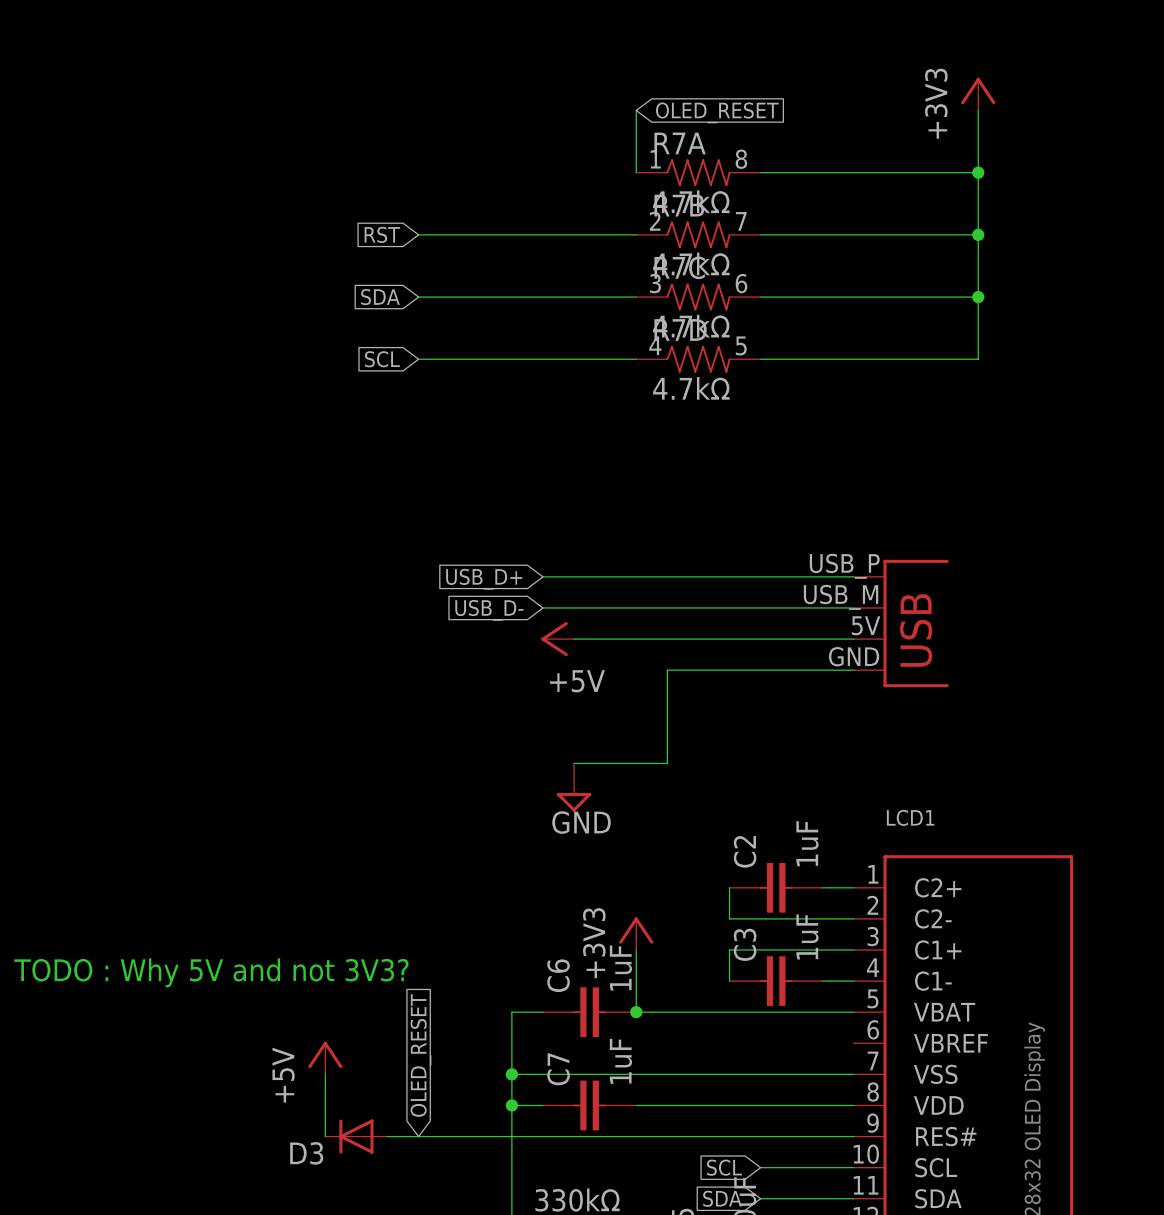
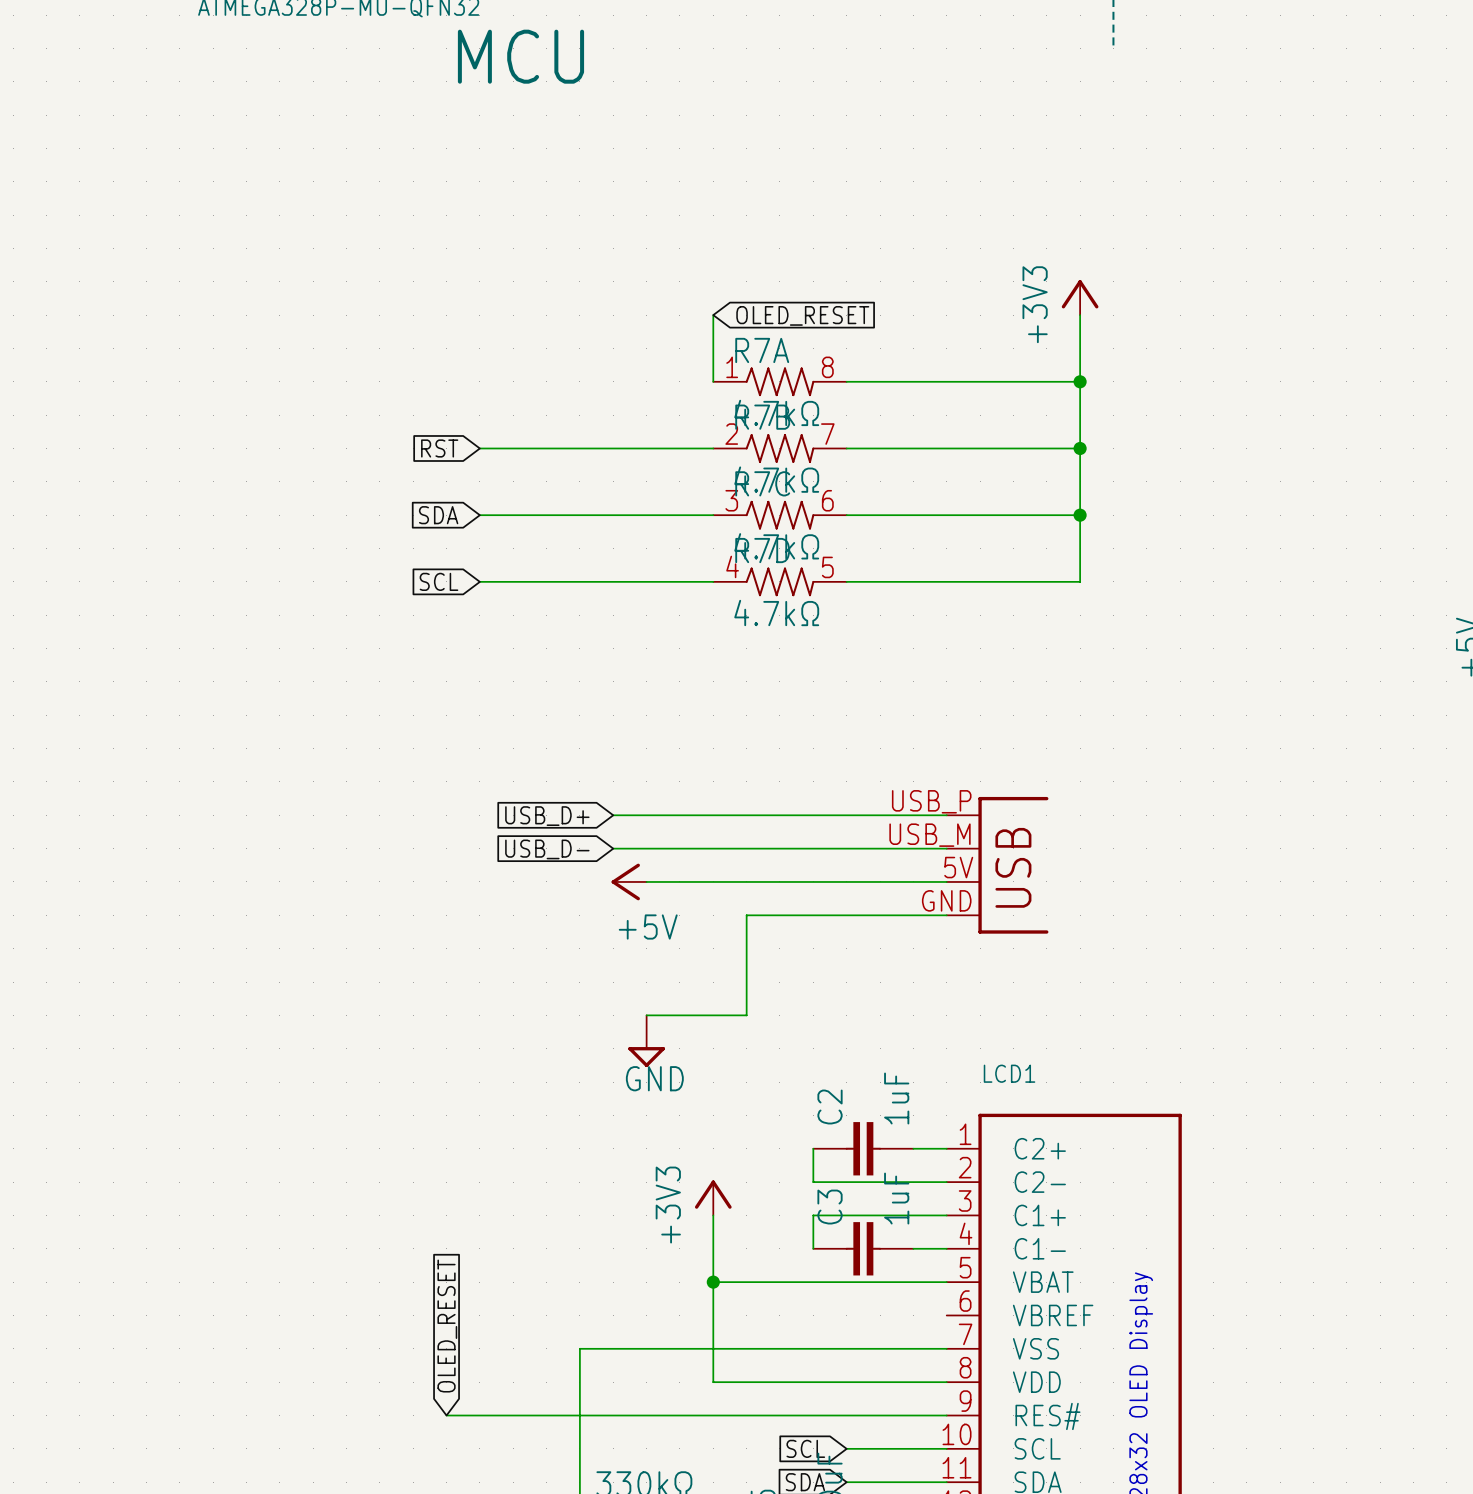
text: TODO : Why 5V and not 3V3? (211, 972) -> none
wire: (542, 1012) (511, 1012) (511, 1074) -> none
C6: 1uF (589, 1012) -> none
wire: none -> (713, 1282) (713, 1382)
global label position: OLED_RESET (420, 1055) -> OLED_RESET (447, 1326)
power symbol: +5V (325, 1058) -> none
wire: (325, 1074) (325, 1136) -> none
junction: (511, 1074) -> none
wire: (511, 1105) (542, 1105) -> none
junction: (511, 1105) -> none
C7: 1uF (589, 1105) -> none
D3: (356, 1136) -> none

